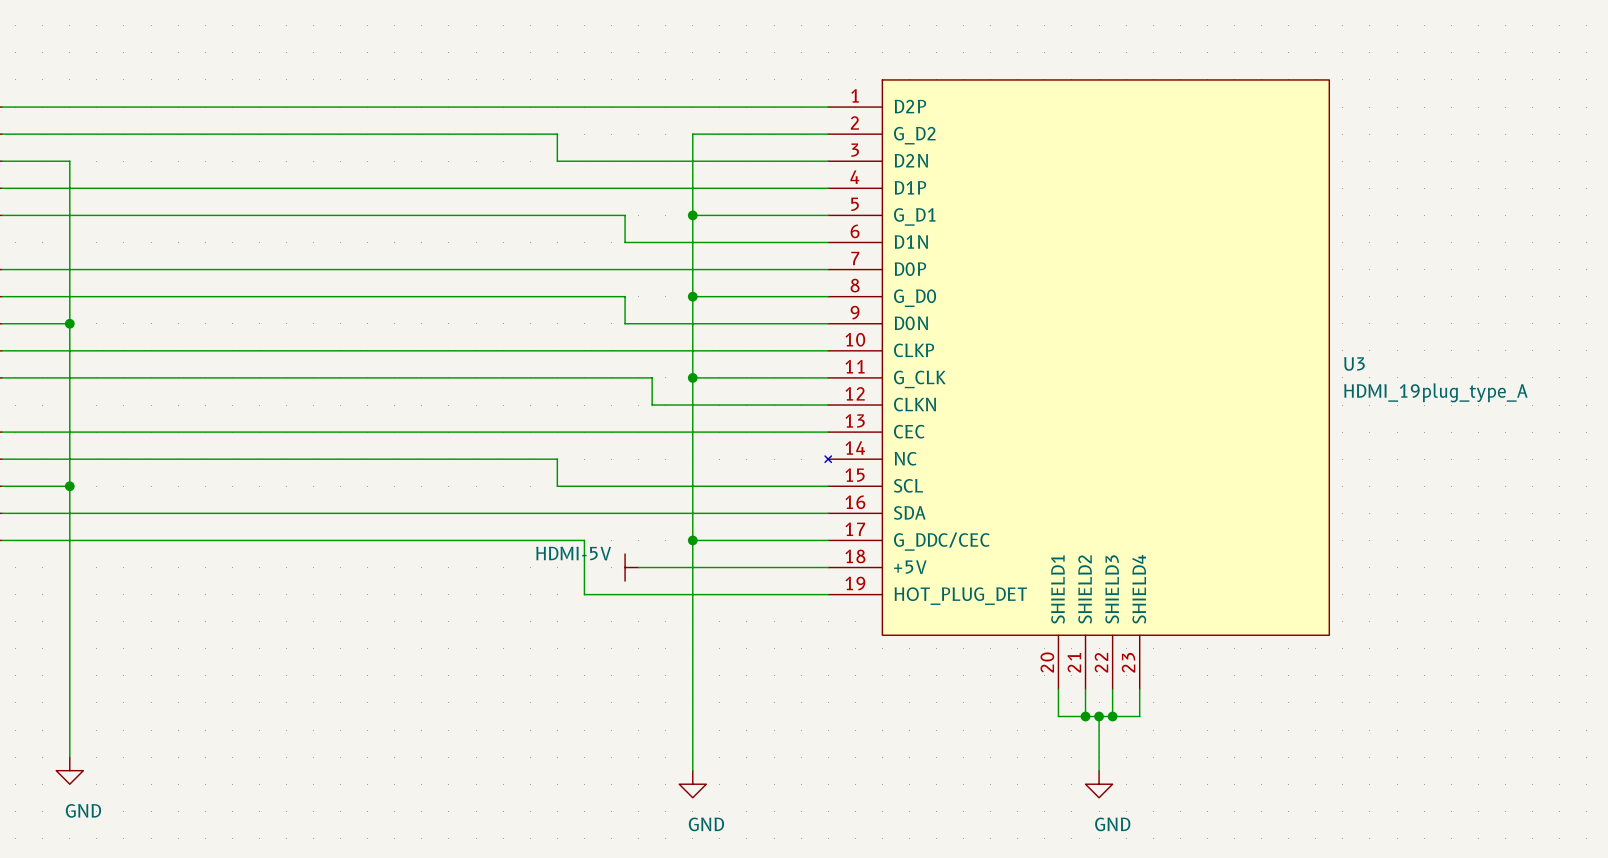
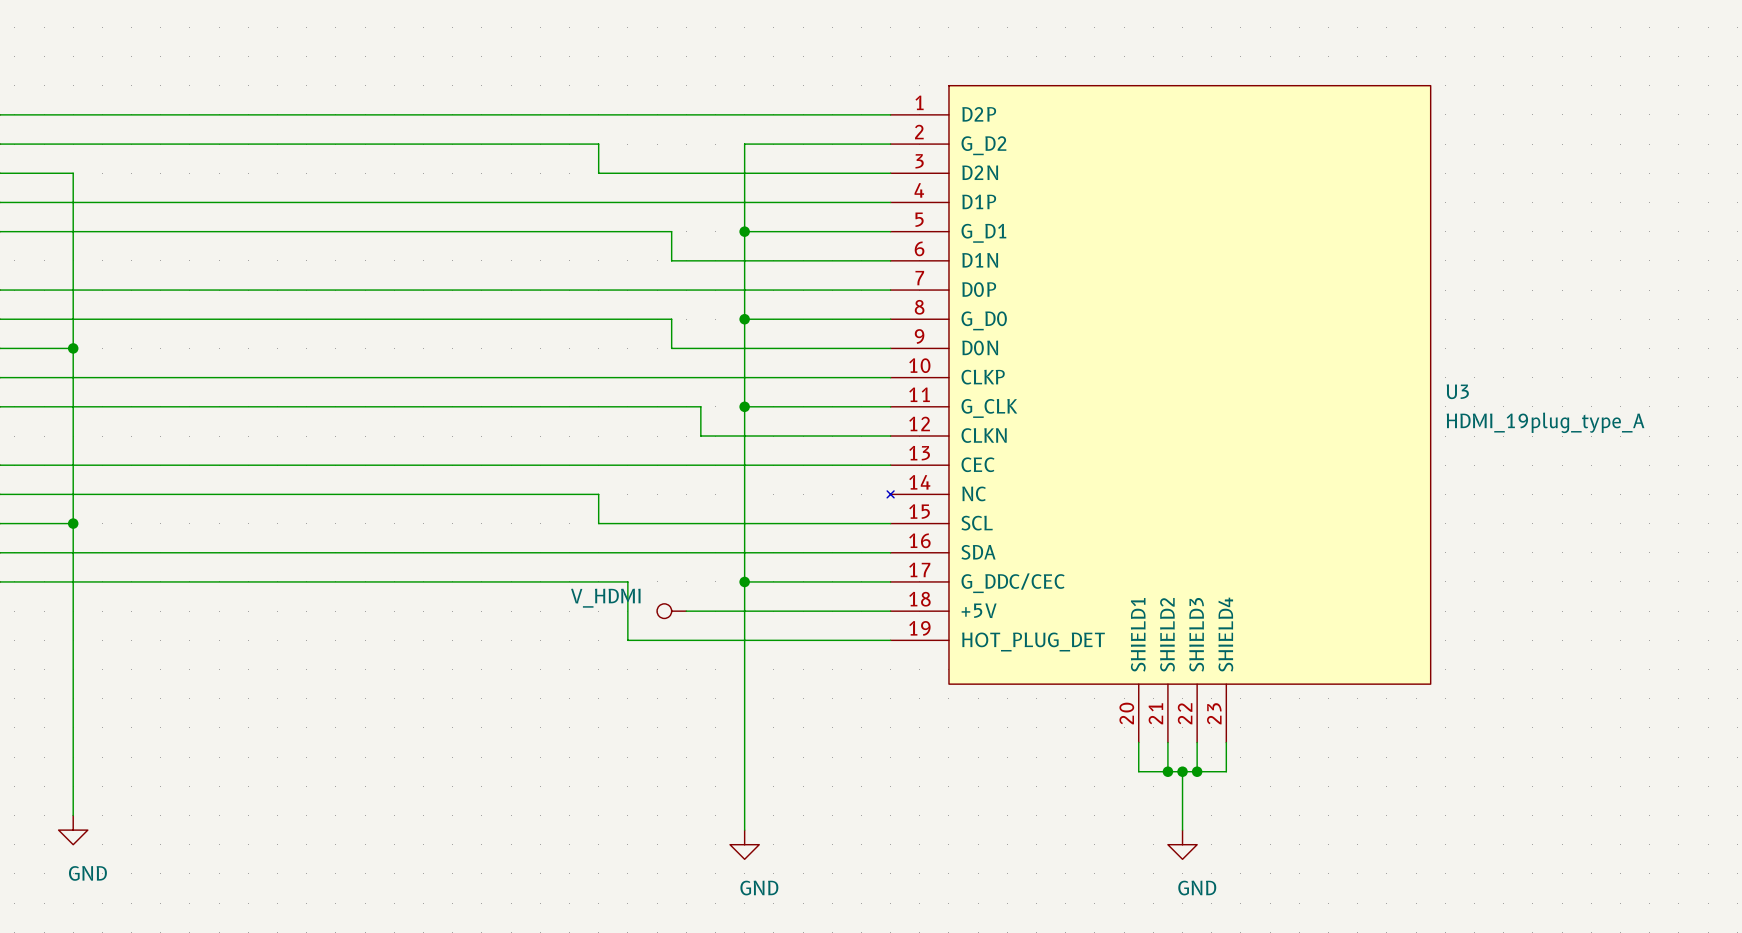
power symbol: HDMI-5V (631, 567) -> V_HDMI (671, 611)

